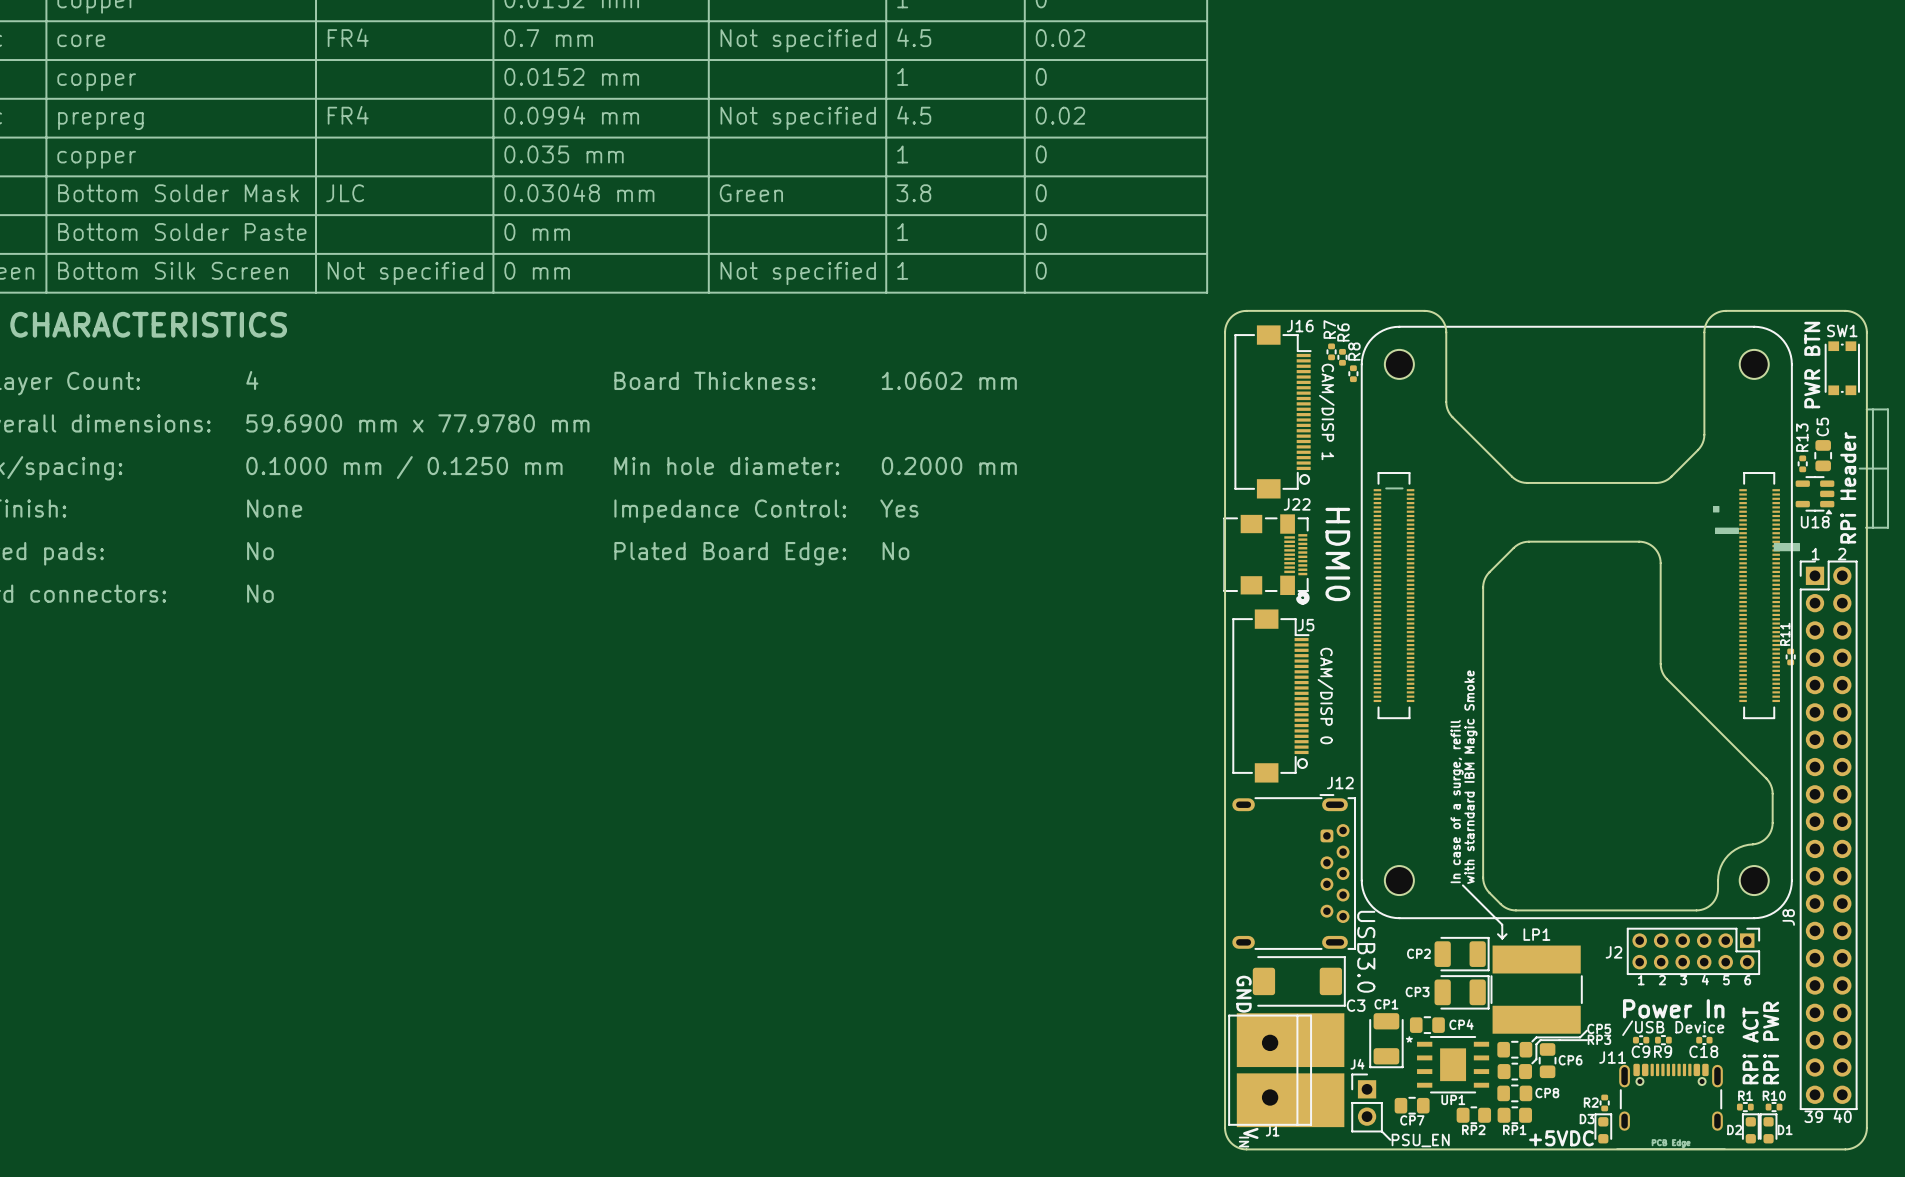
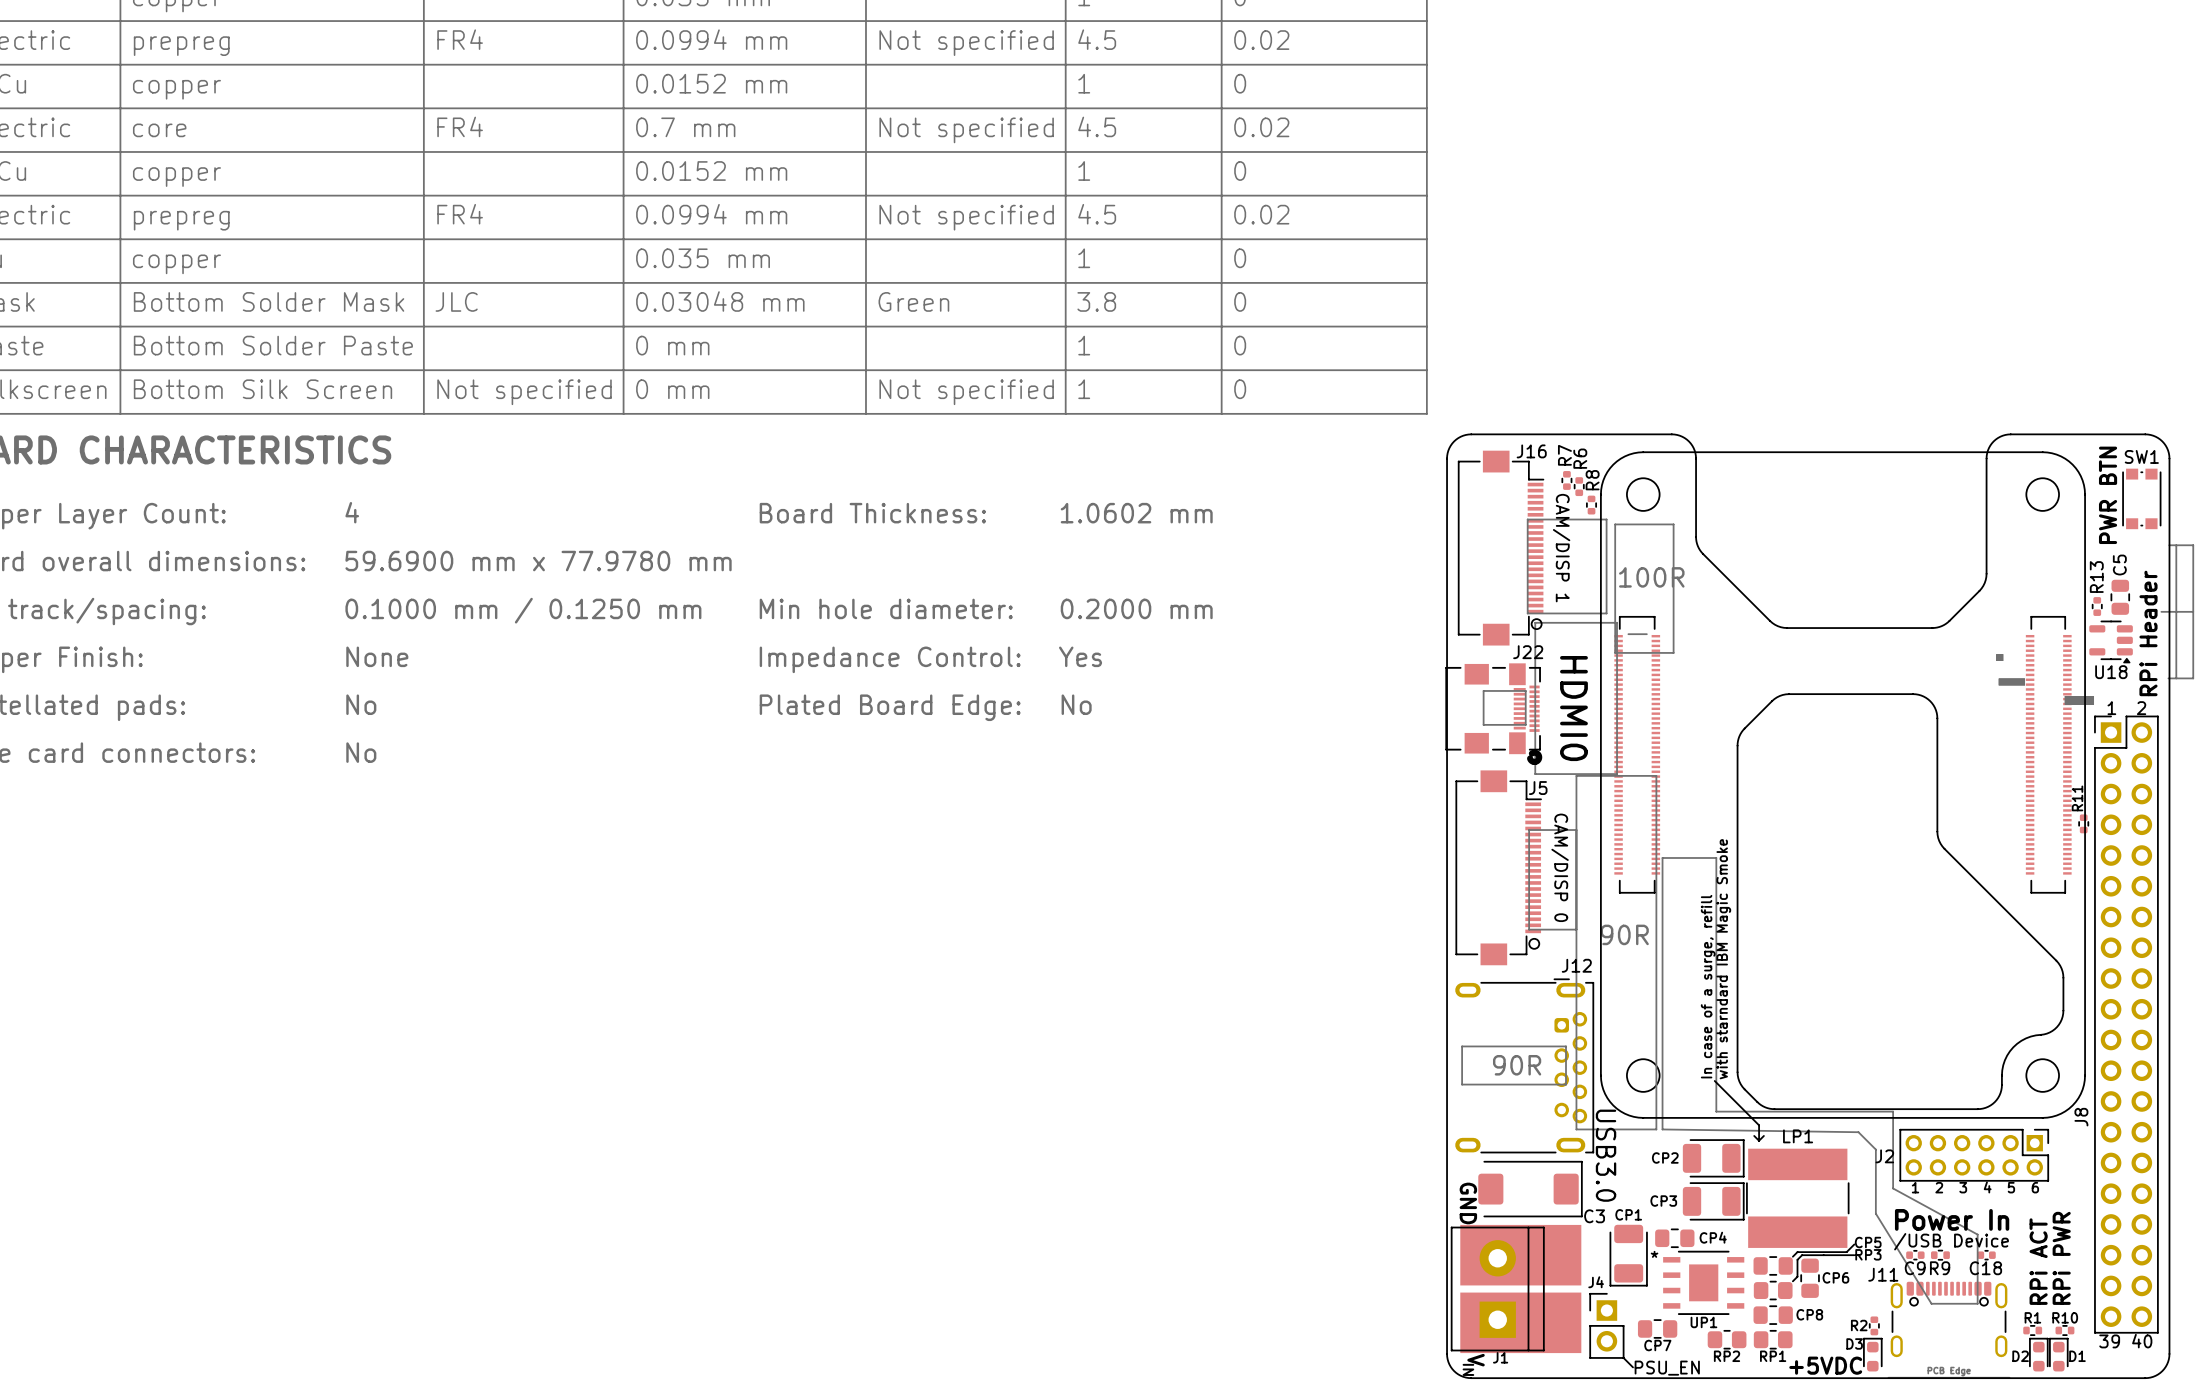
line: none -> (1527, 519) (1606, 519) (1606, 613) (1527, 613) (1527, 519)
line: none -> (1615, 524) (1673, 524) (1673, 652) (1615, 652) (1615, 524)
text: none -> 100R (1651, 577)
line: none -> (1535, 622) (1617, 622) (1617, 774) (1535, 774) (1535, 622)
line: none -> (1483, 690) (1525, 690) (1525, 724) (1483, 724) (1483, 690)
line: none -> (1576, 775) (1576, 1129) (1656, 1129) (1656, 775) (1576, 775)
line: none -> (1576, 830) (1529, 830) (1529, 929) (1576, 929)
line: none -> (1662, 857) (1716, 857) (1716, 1111) (1893, 1111) (1893, 1188) (1977, 1234) (1977, 1303) (1931, 1303) (1875, 1213) (1875, 1149) (1858, 1132) (1662, 1129) (1662, 857)
text: none -> 90R (1624, 934)
line: none -> (1462, 1046) (1566, 1046) (1566, 1084) (1462, 1084) (1462, 1046)
text: none -> 90R (1517, 1065)

